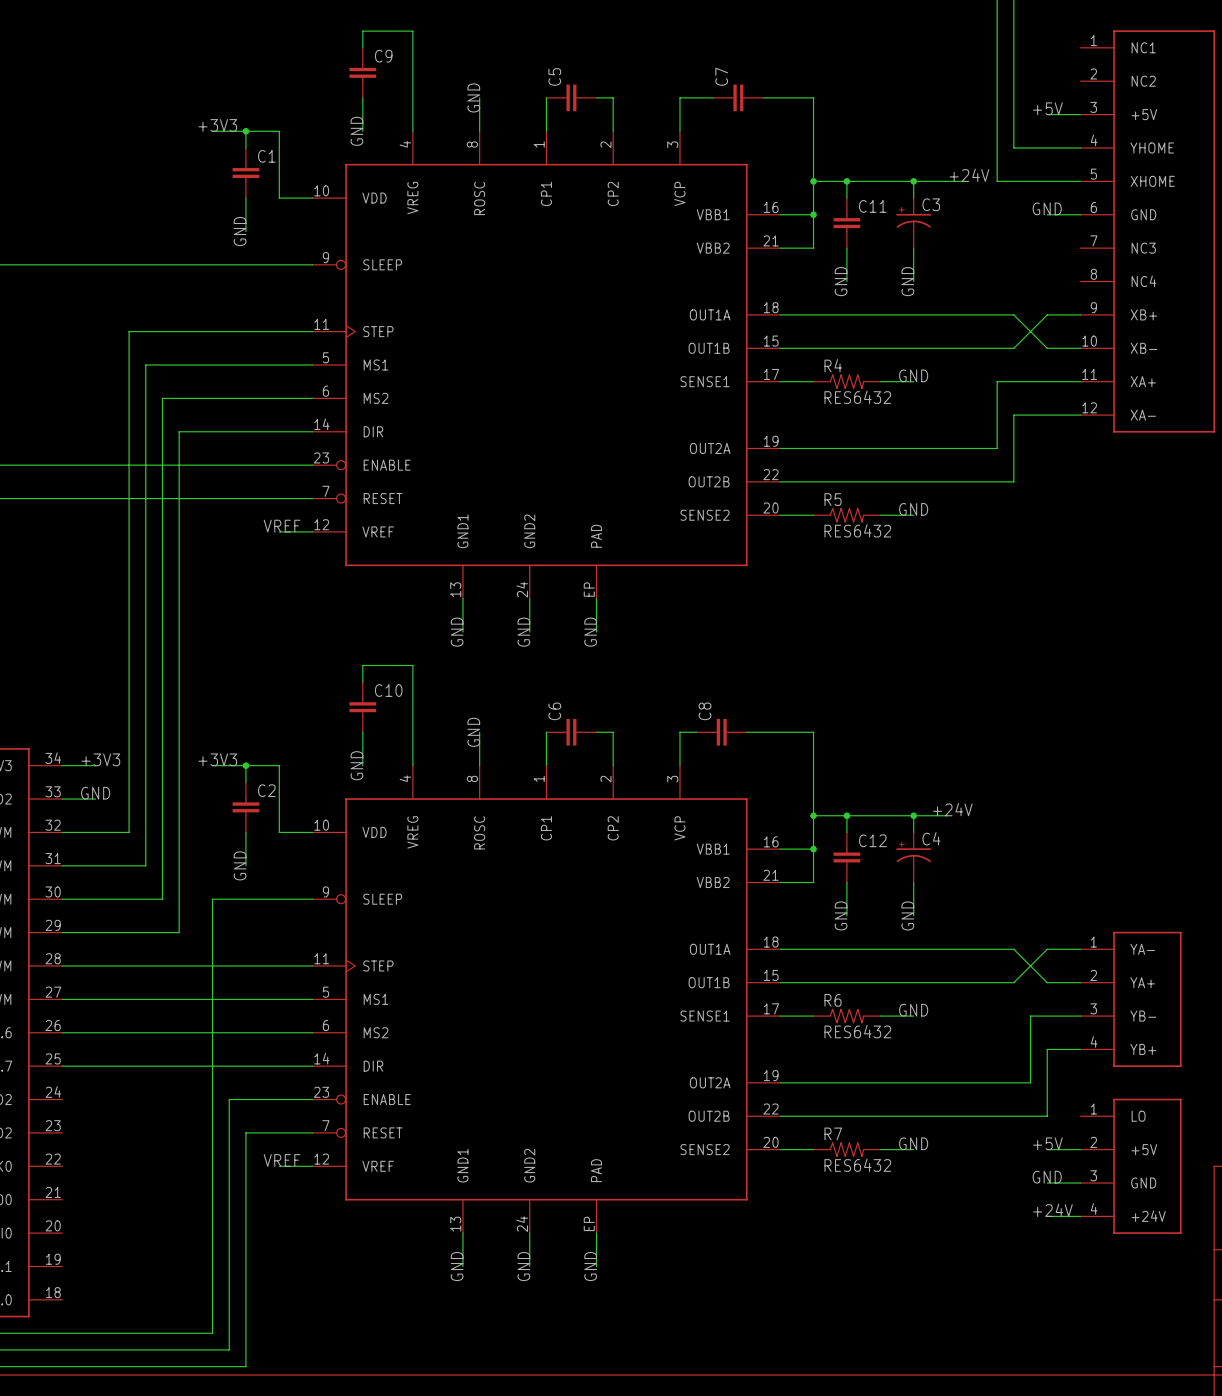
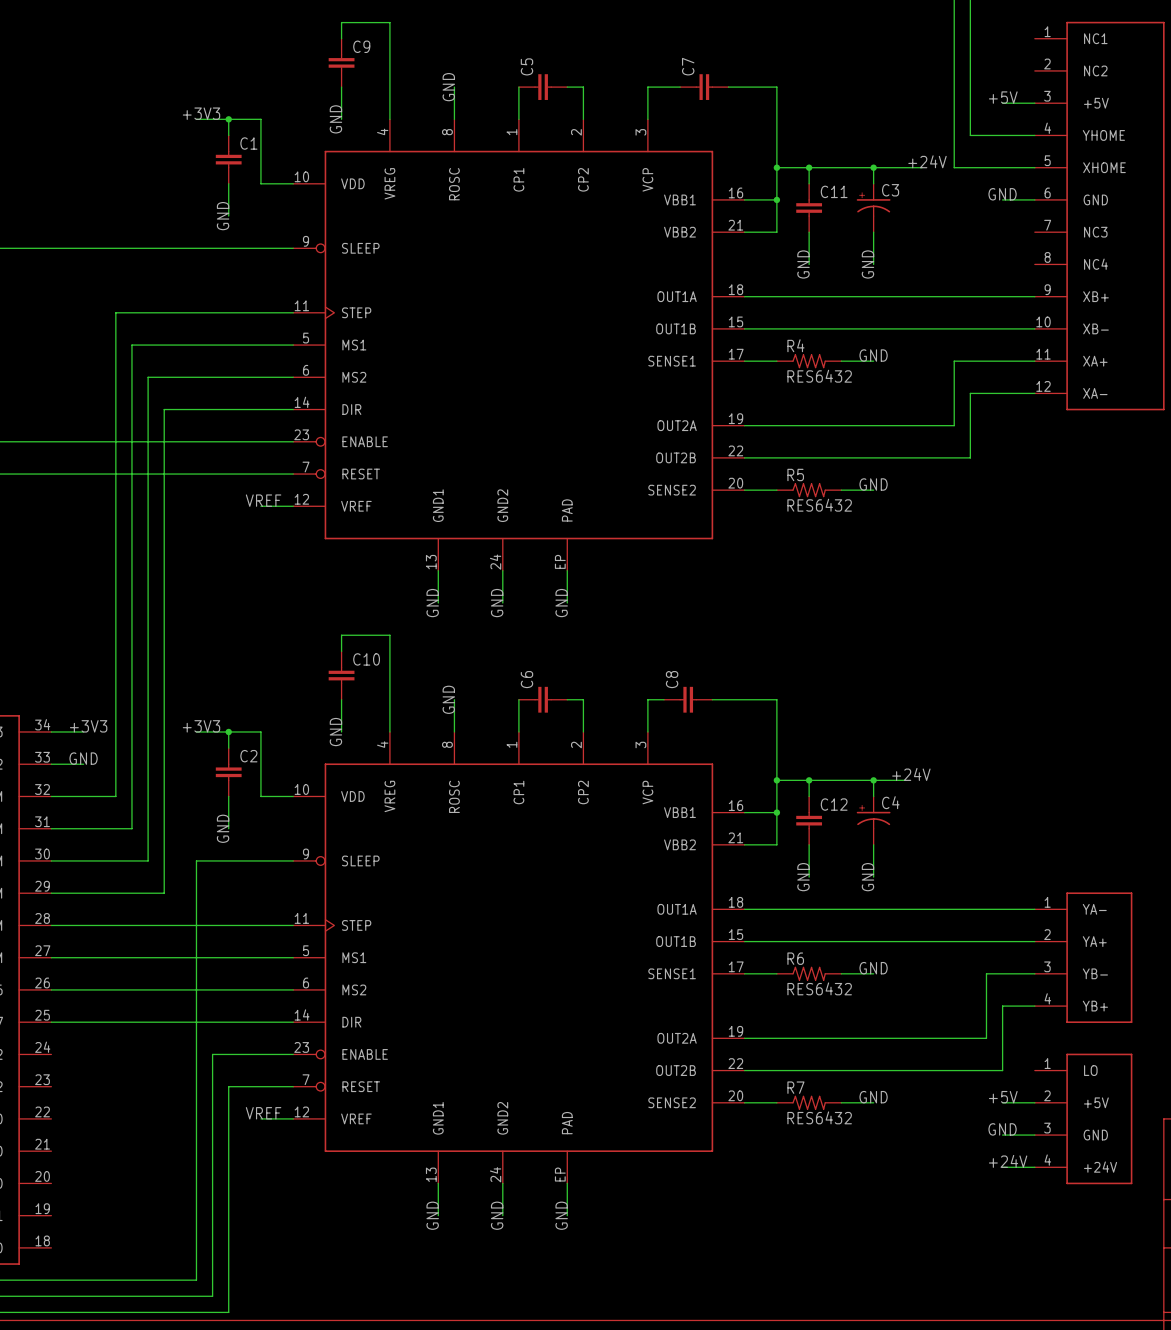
wire: (1013, 314) (1047, 348) -> (970, 296) (1002, 296)
wire: (1047, 314) (1013, 348) -> (1002, 328) (970, 328)
wire: (1013, 949) (1047, 982) -> (970, 909) (1002, 909)
wire: (1047, 949) (1013, 982) -> (1002, 941) (970, 941)

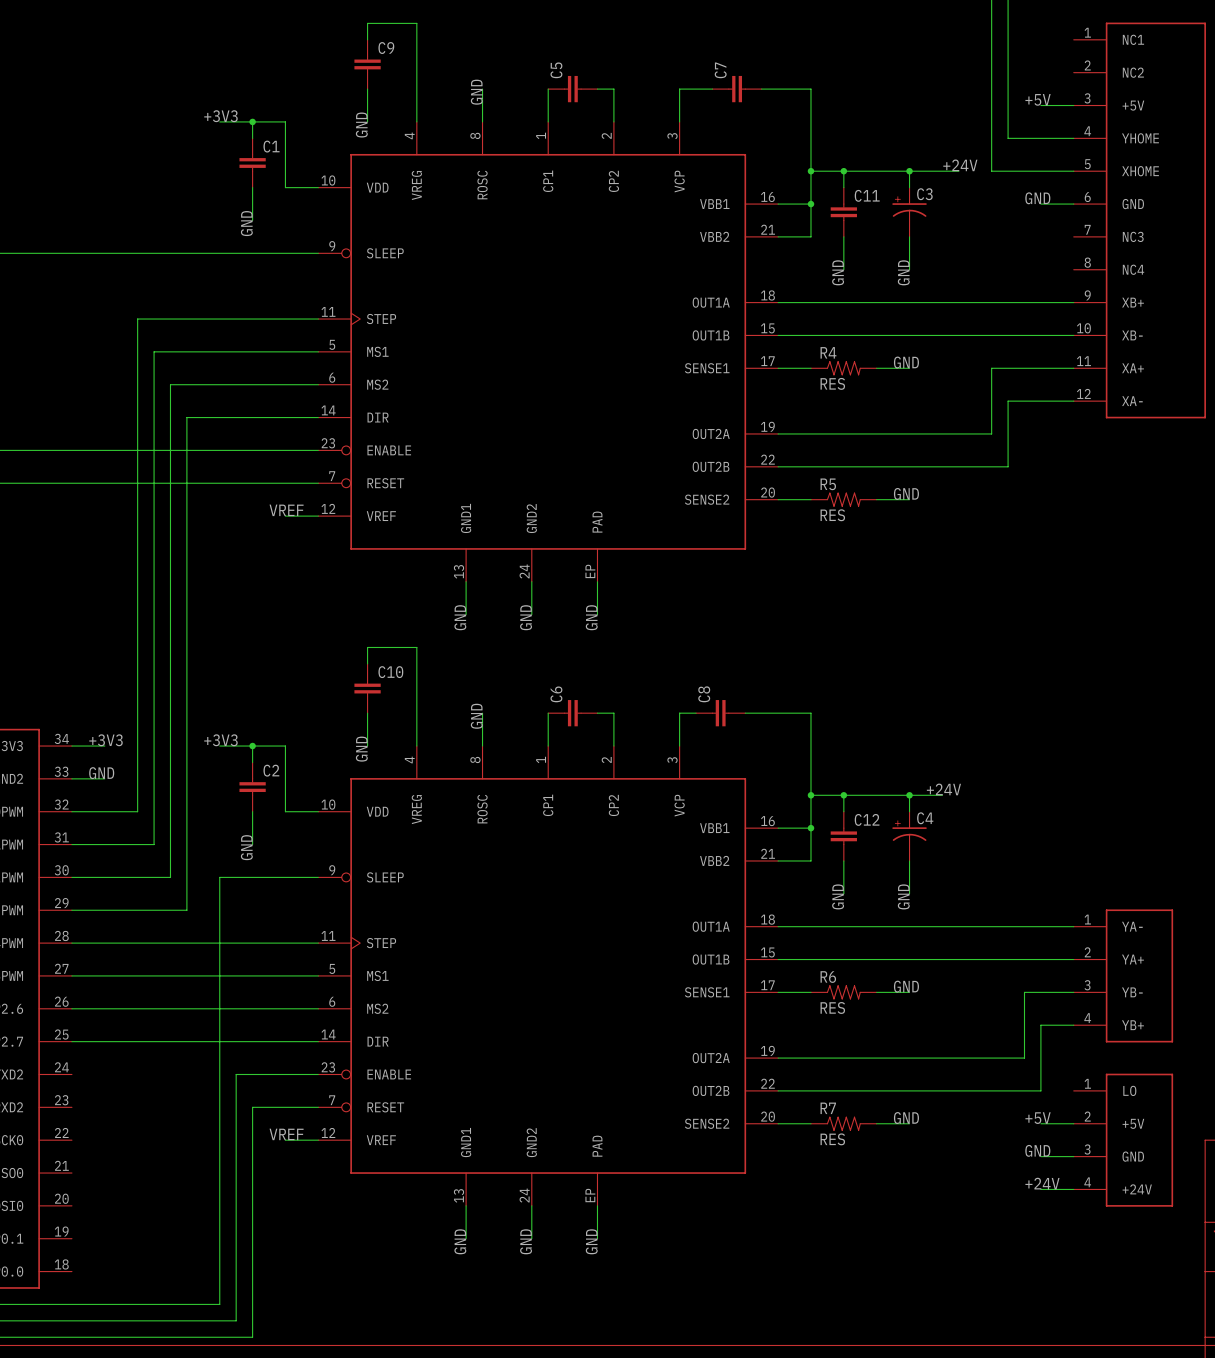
R4 value: RES6432 (819, 376) -> RES (832, 383)
R5 value: RES6432 (819, 505) -> RES (832, 515)
R6 value: RES6432 (819, 988) -> RES (832, 1007)
R7 value: RES6432 (819, 1117) -> RES (832, 1139)

